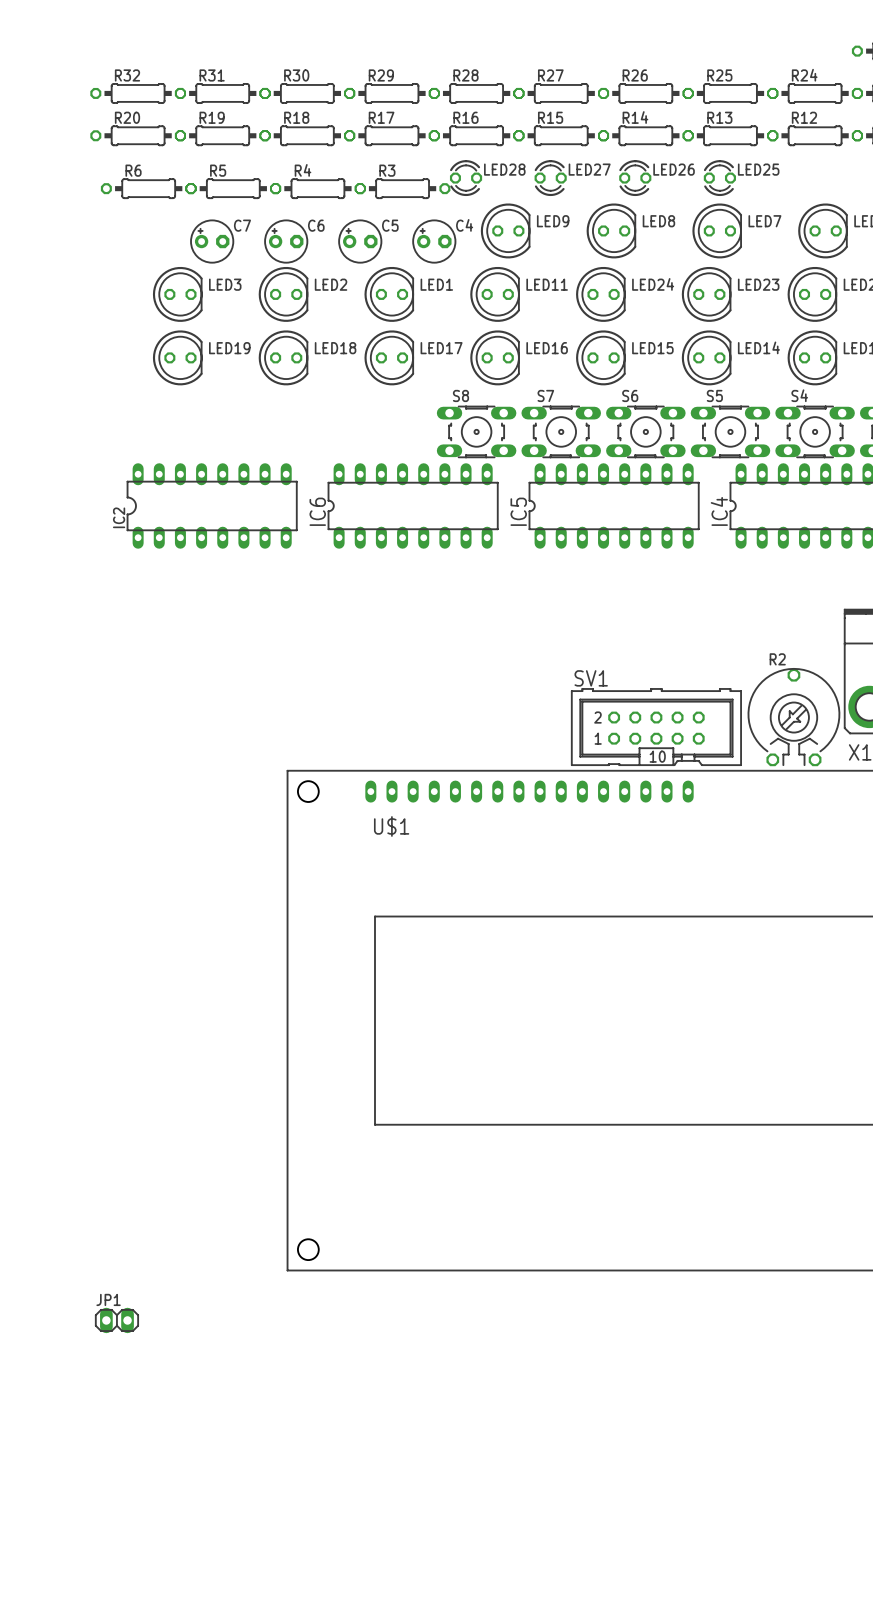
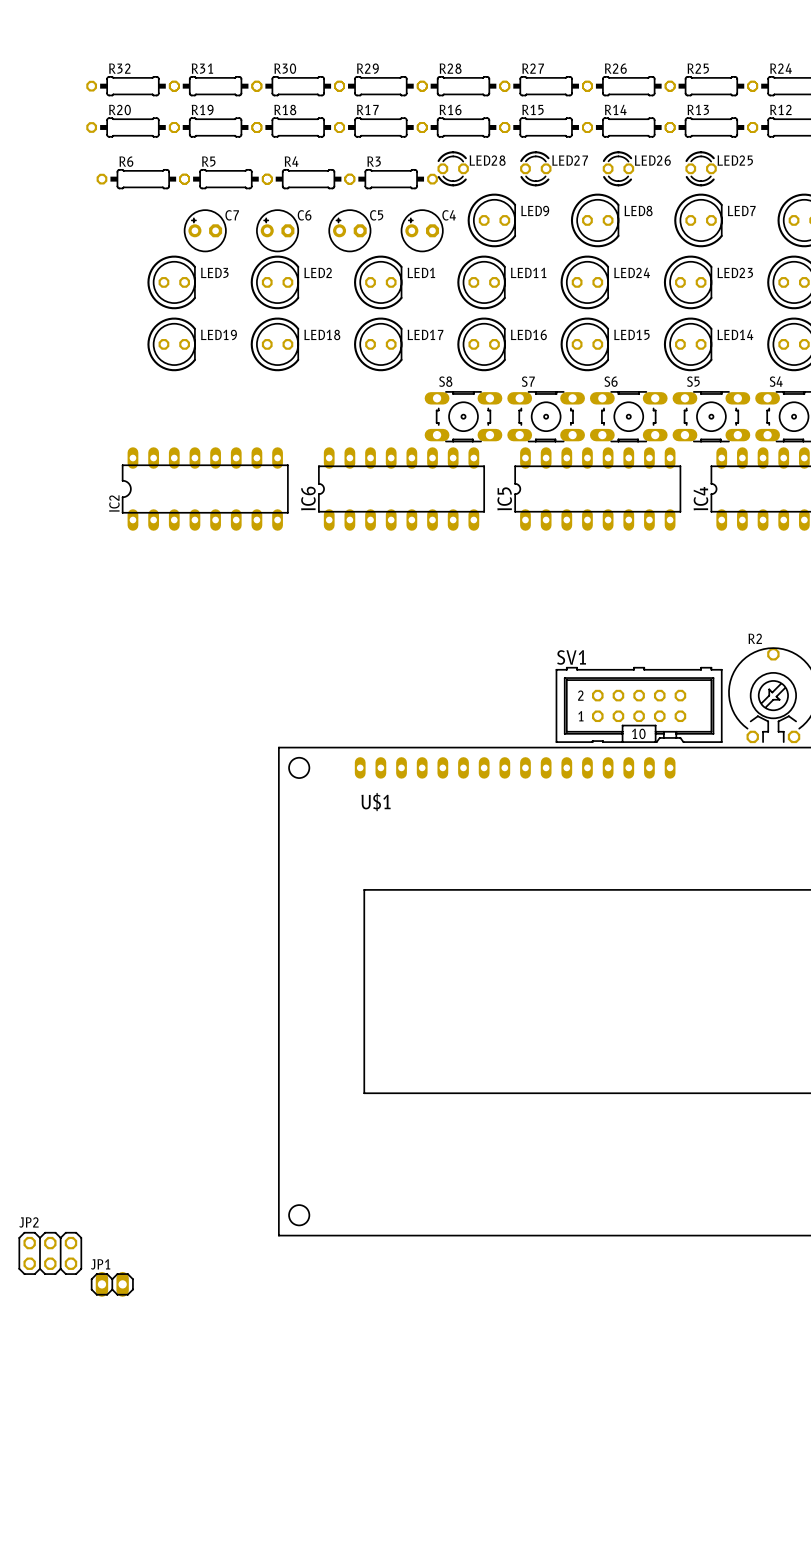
JP2: none -> (50, 1253)

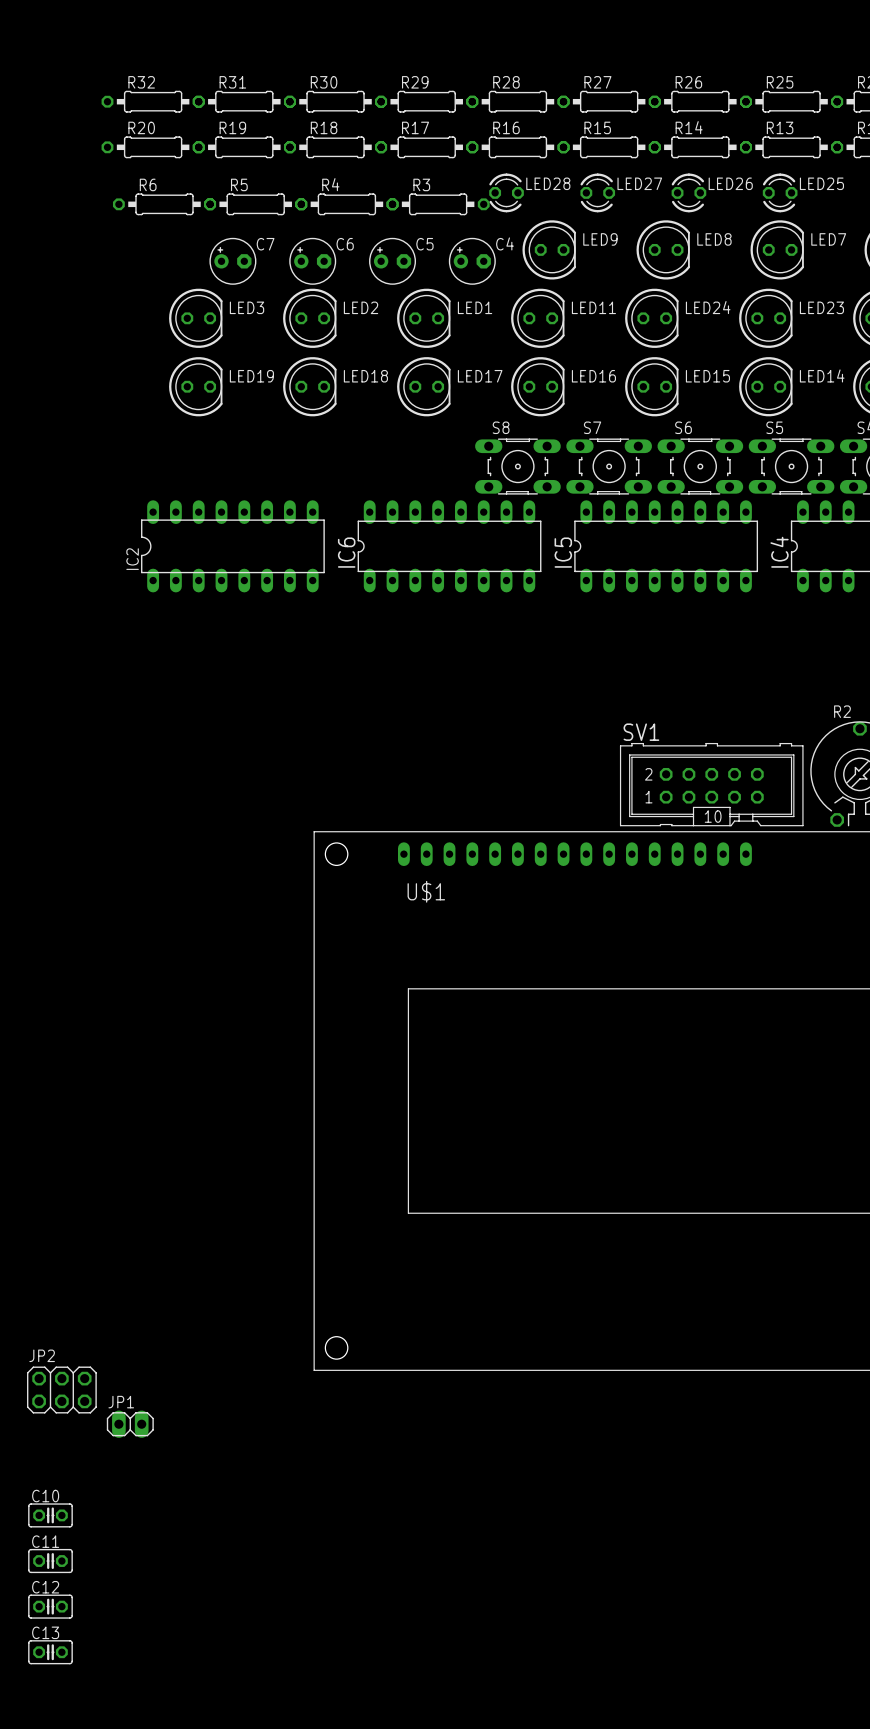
C10: none -> (50, 1515)
C11: none -> (50, 1561)
C12: none -> (50, 1606)
C13: none -> (50, 1652)

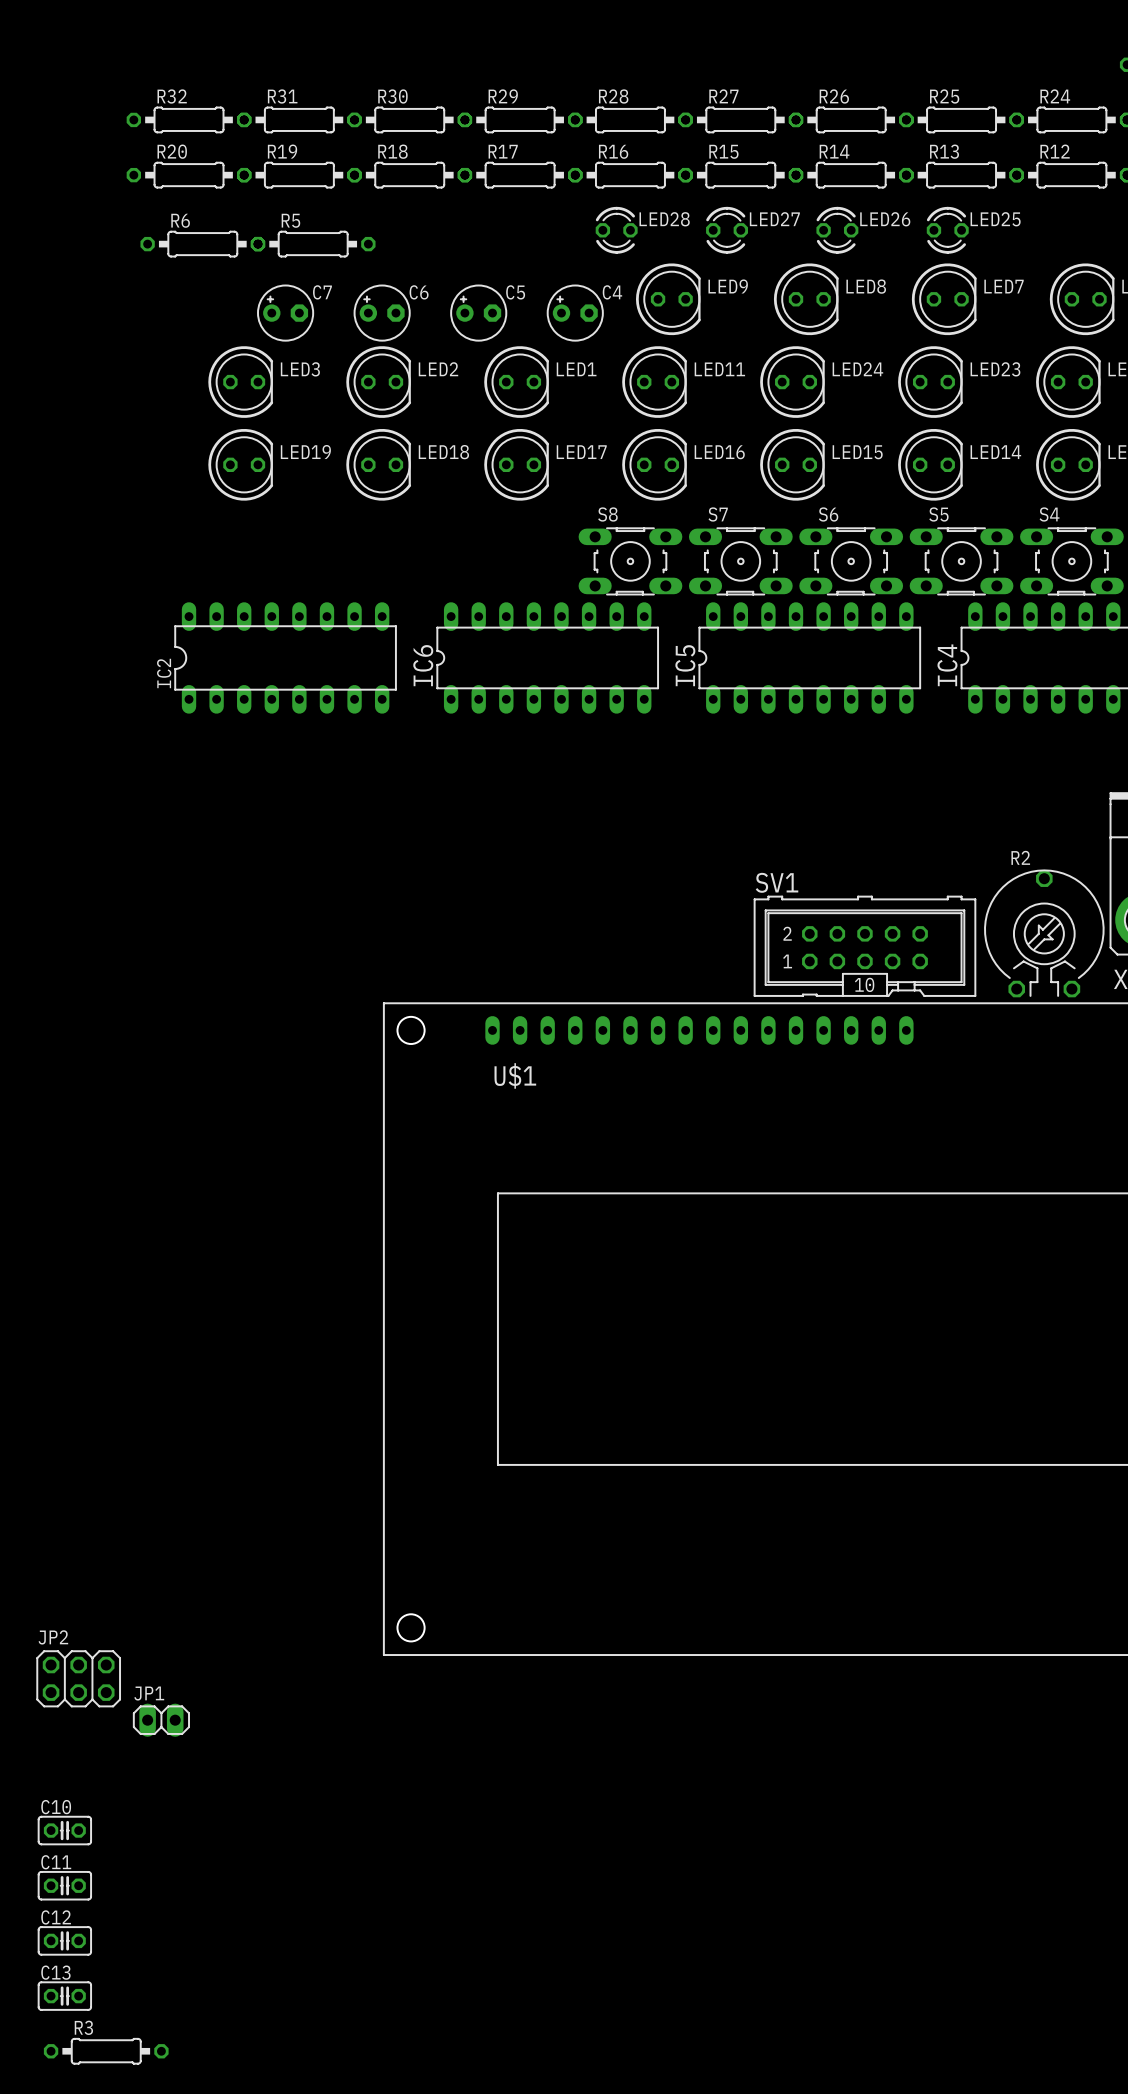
R4: (346, 204) -> none
R3 position: (438, 204) -> (106, 2051)

